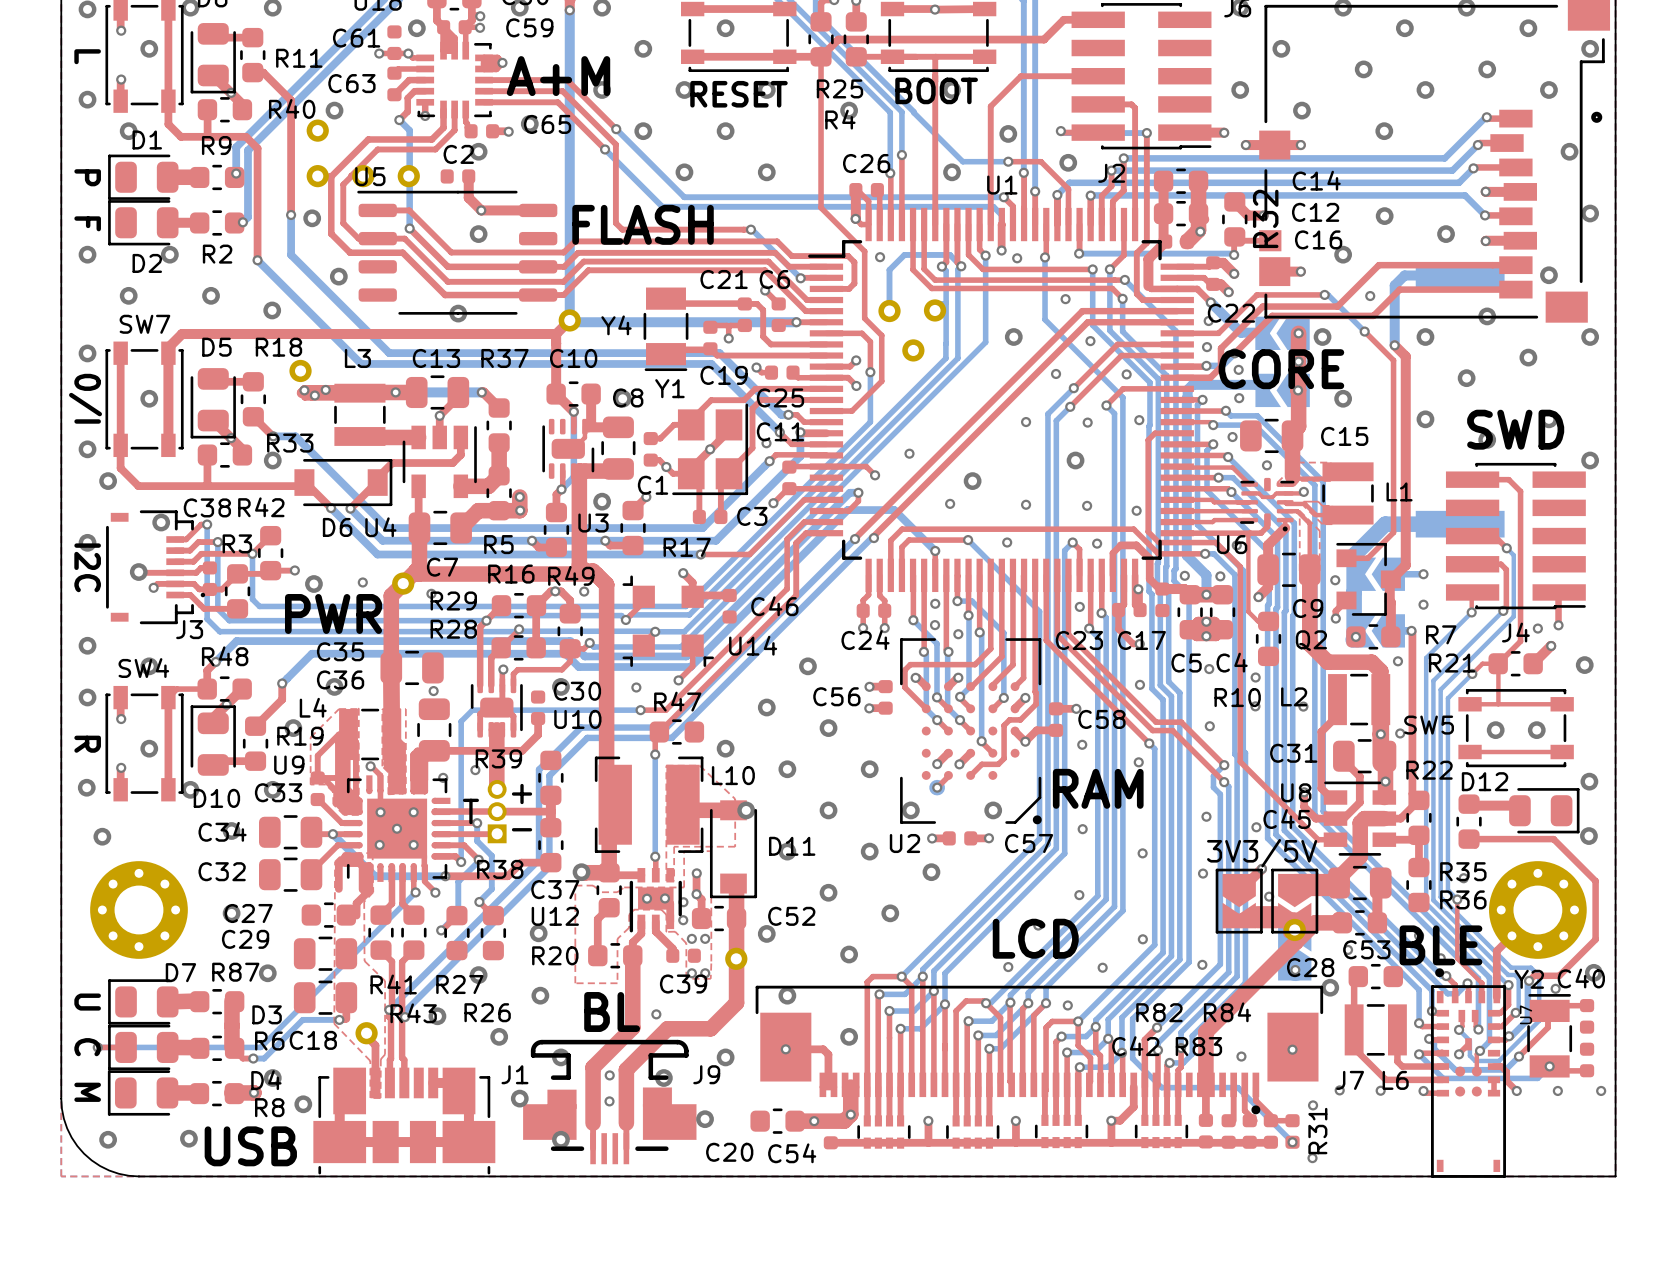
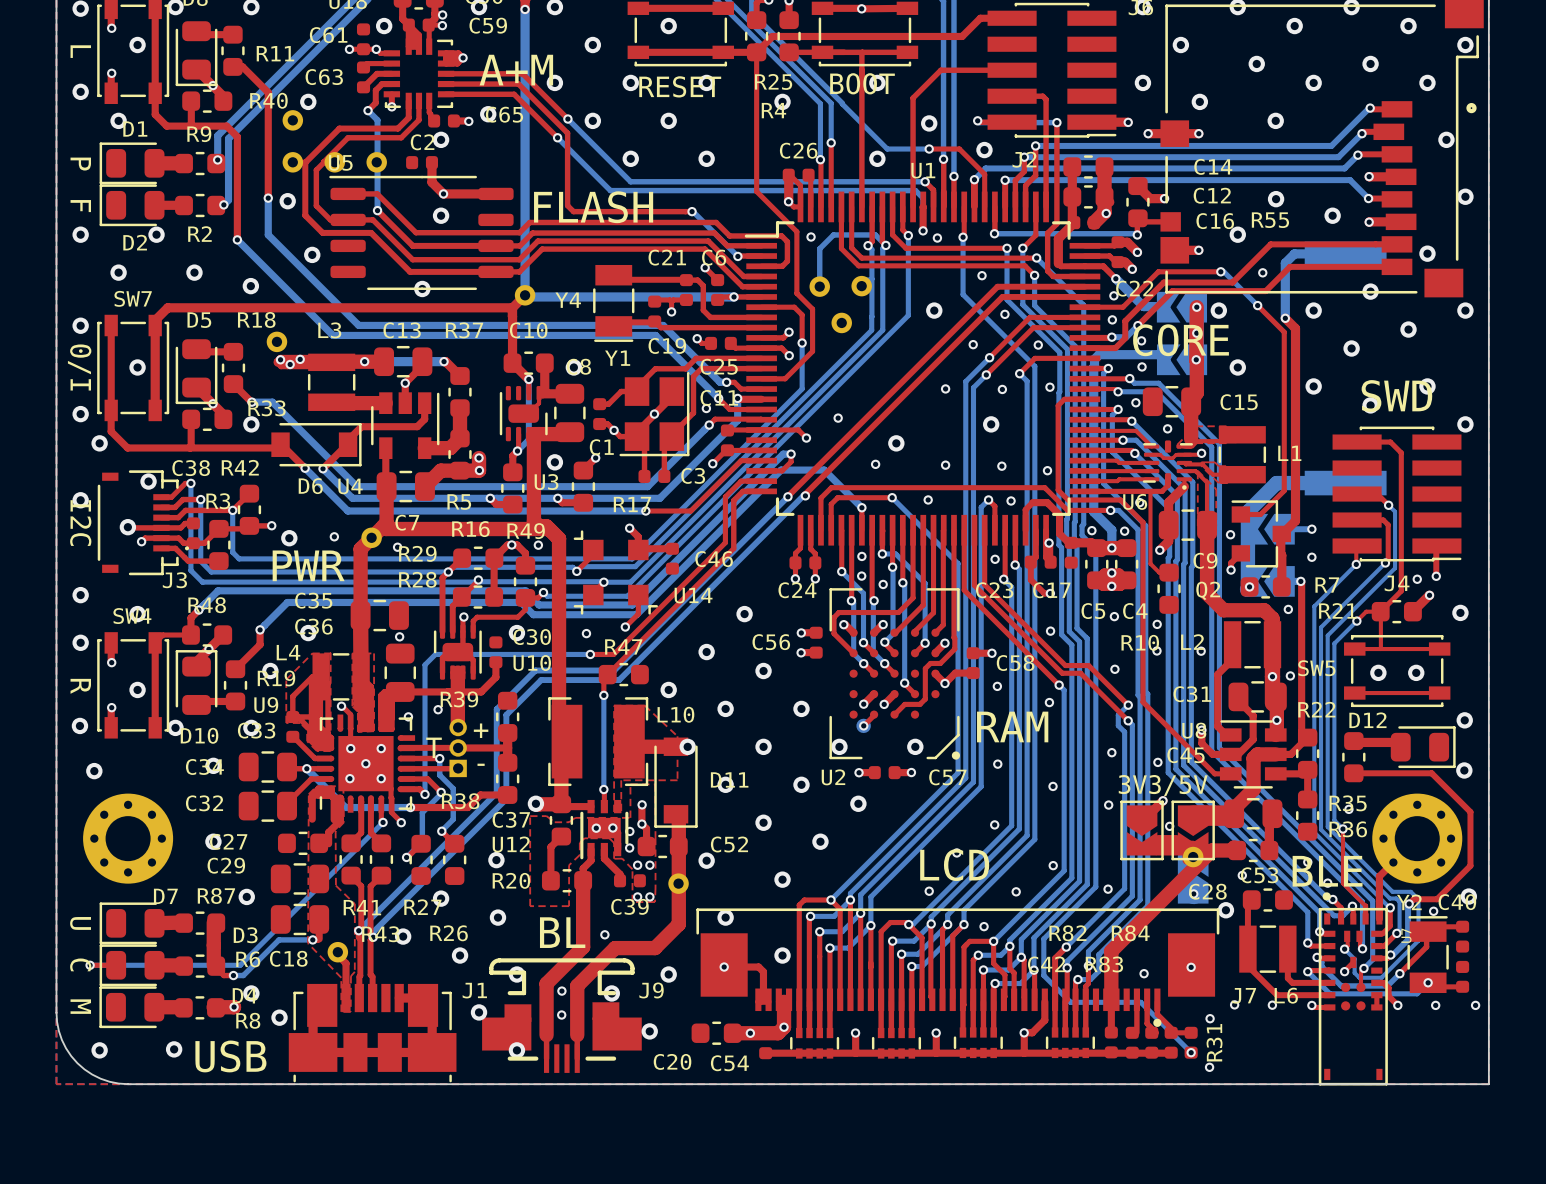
R32 name: R32 (1265, 218) -> R55 (1270, 220)

